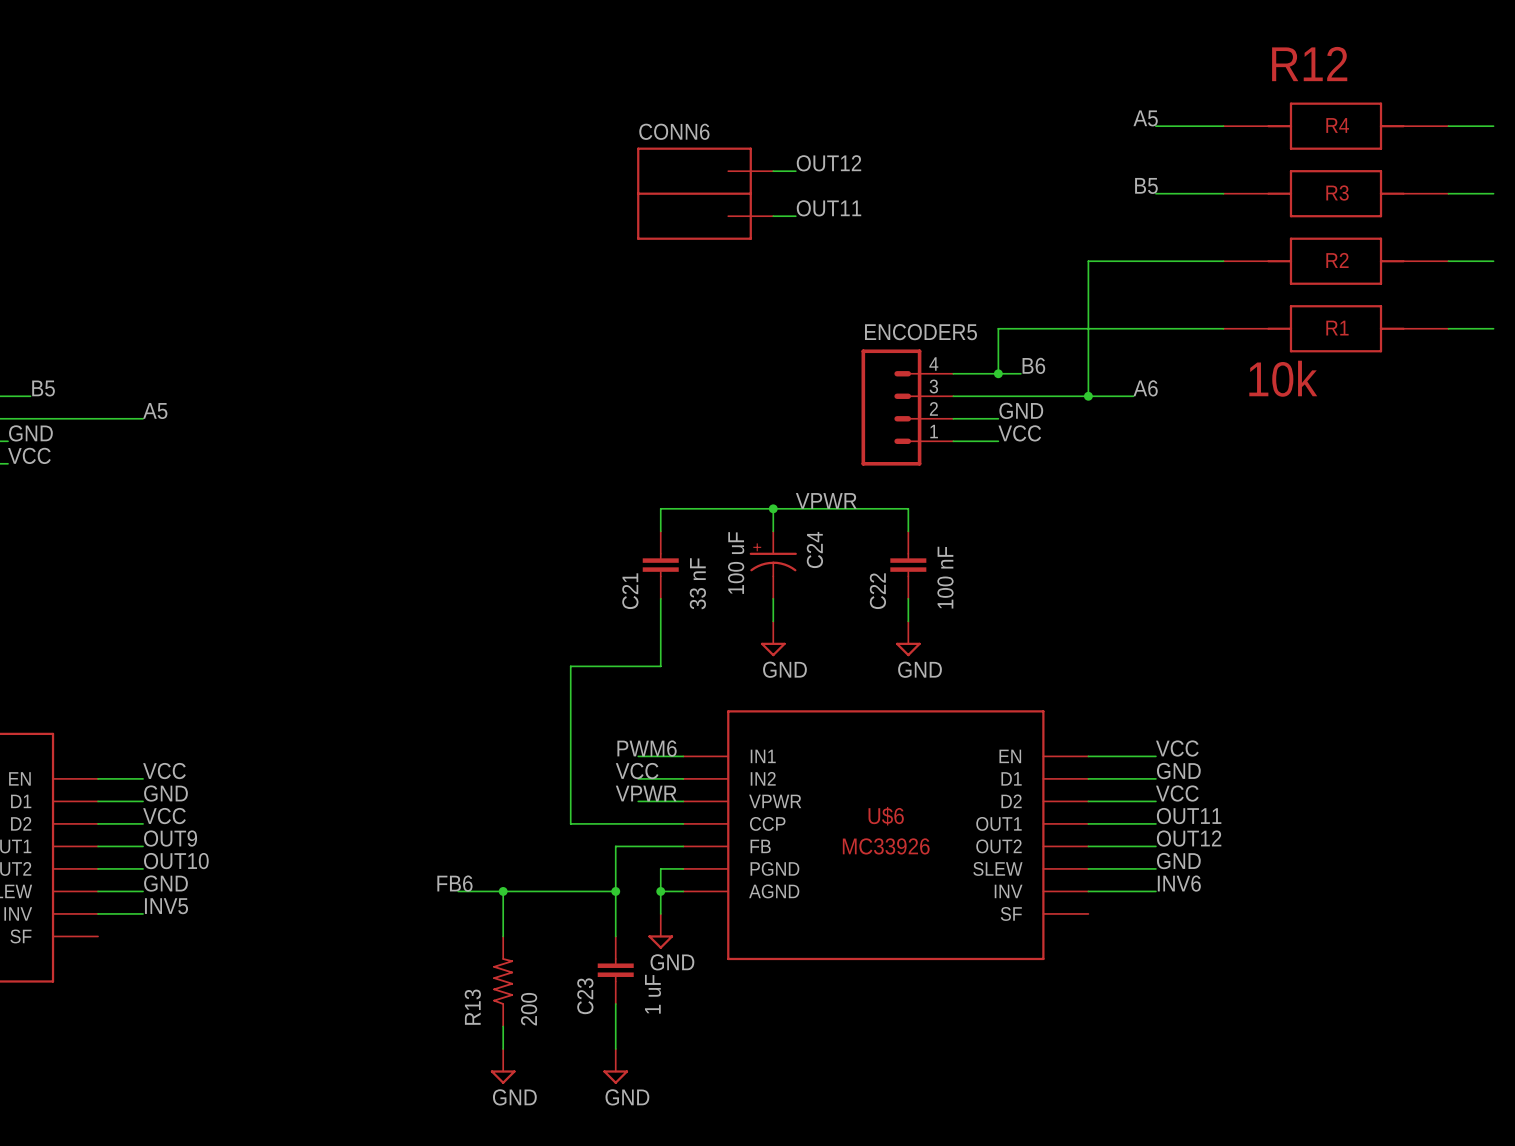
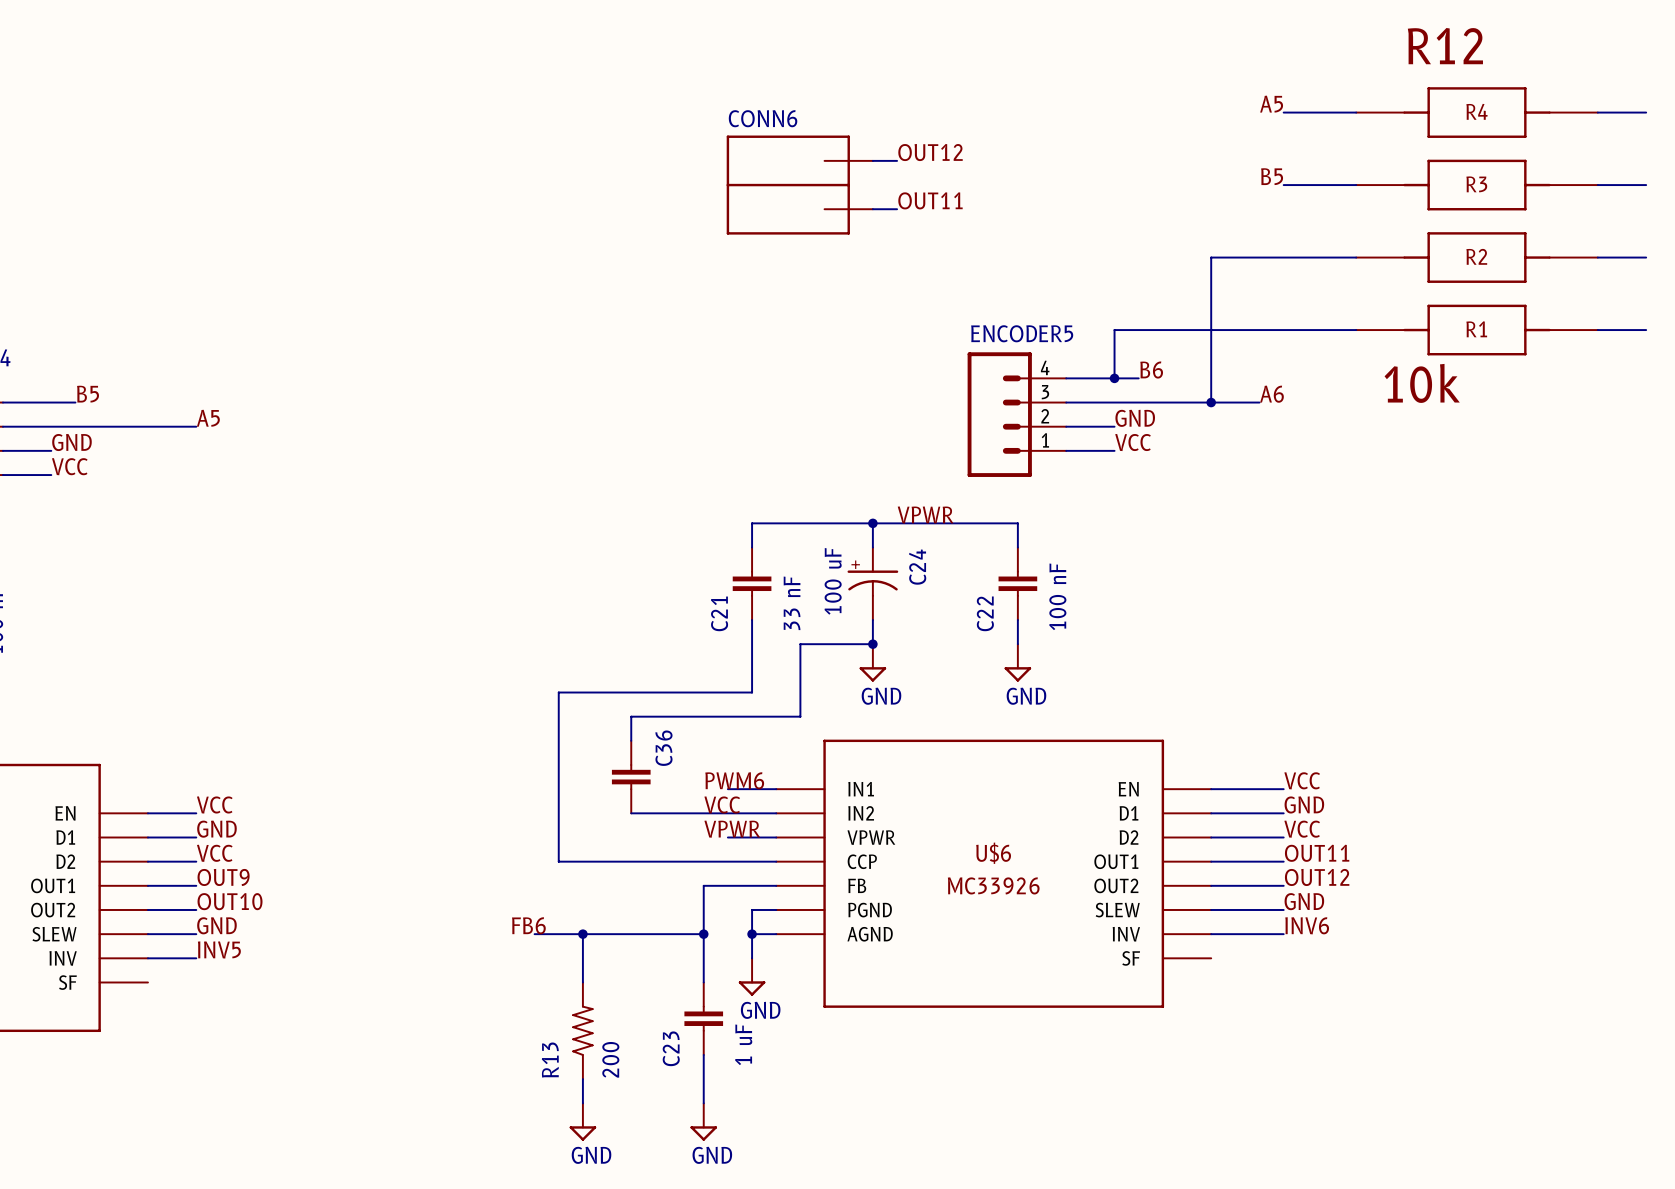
wire: none -> (872, 644) (800, 644) (800, 716) (631, 716) (631, 740)
junction: none -> (872, 644)
wire: (570, 666) (570, 823) -> (655, 692) (558, 692) (558, 861) (655, 861)
C36: none -> (631, 777)
wire: none -> (631, 813) (727, 813)

